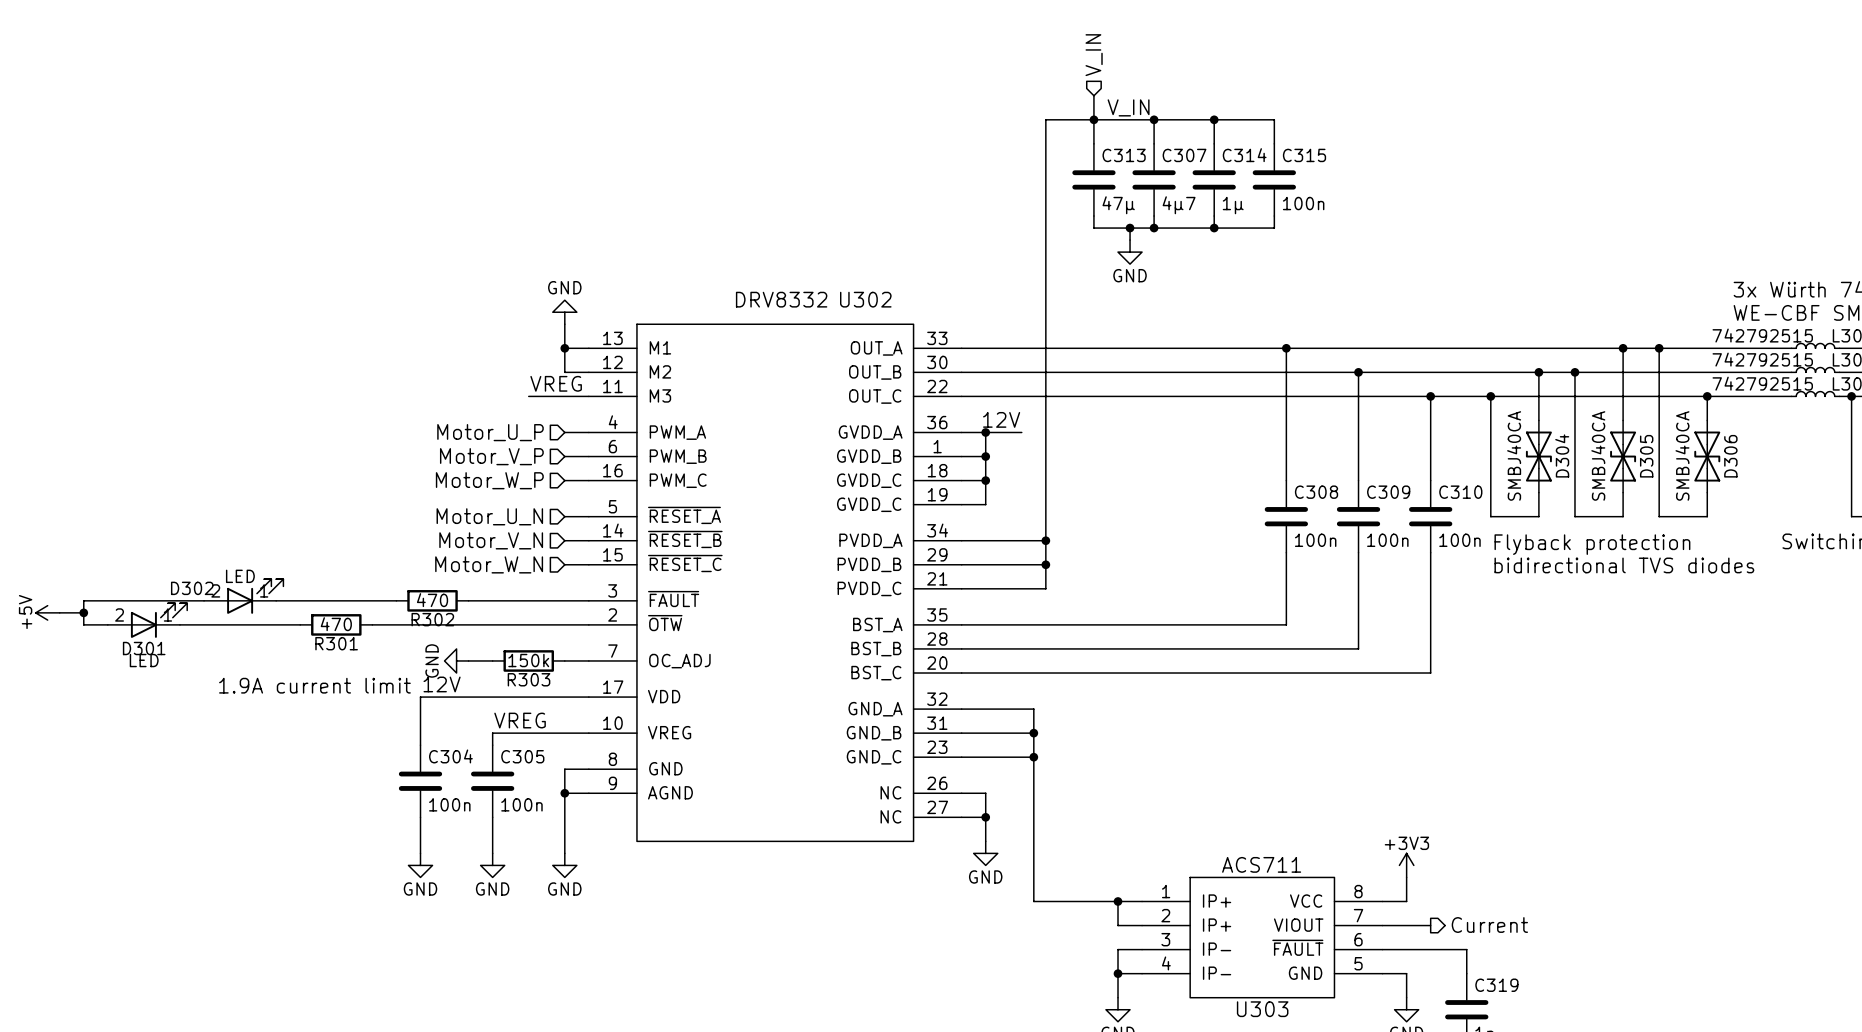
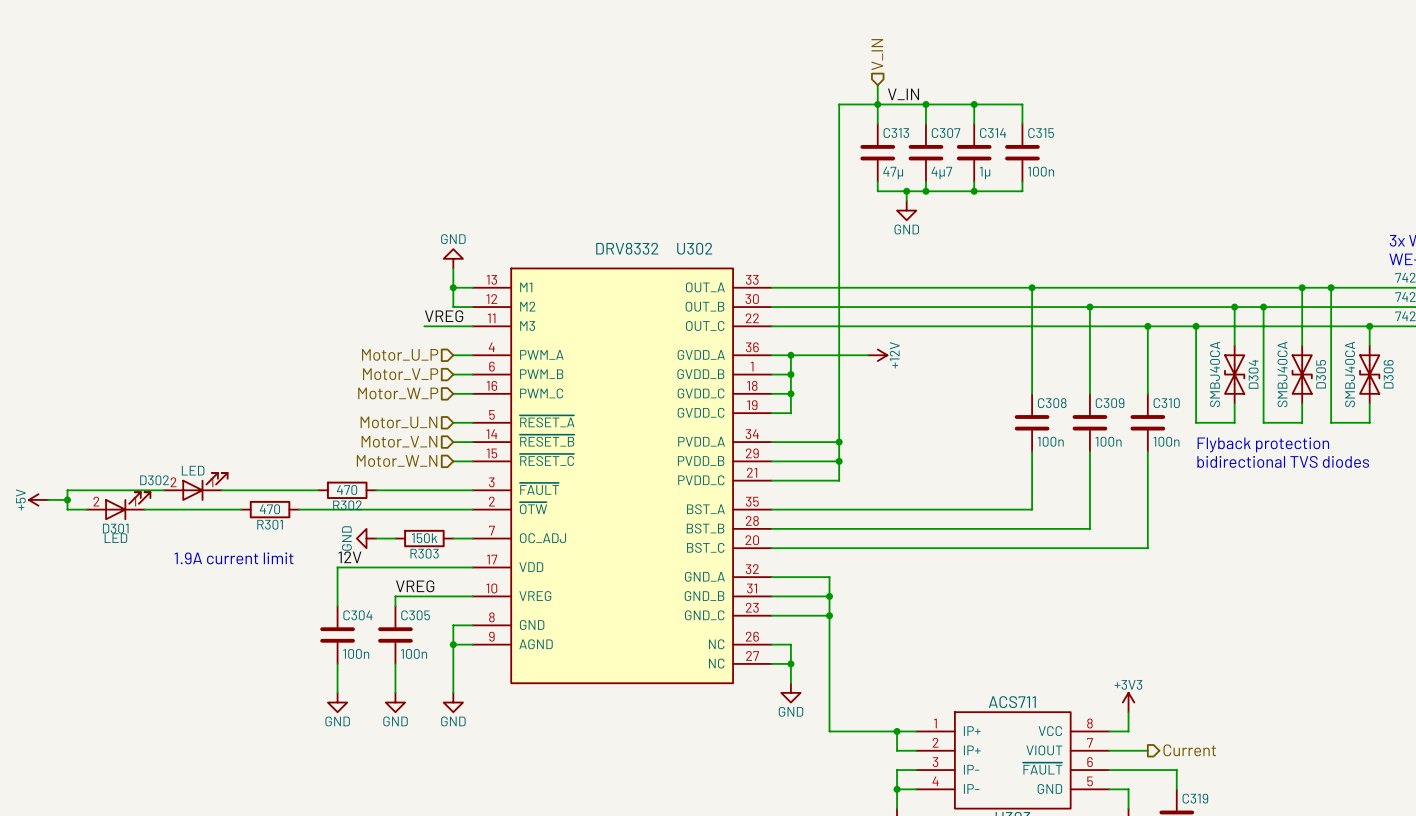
label: 12V (1001, 419) -> none
wire: none -> (819, 355) (868, 355)
power symbol: none -> +12V (877, 355)

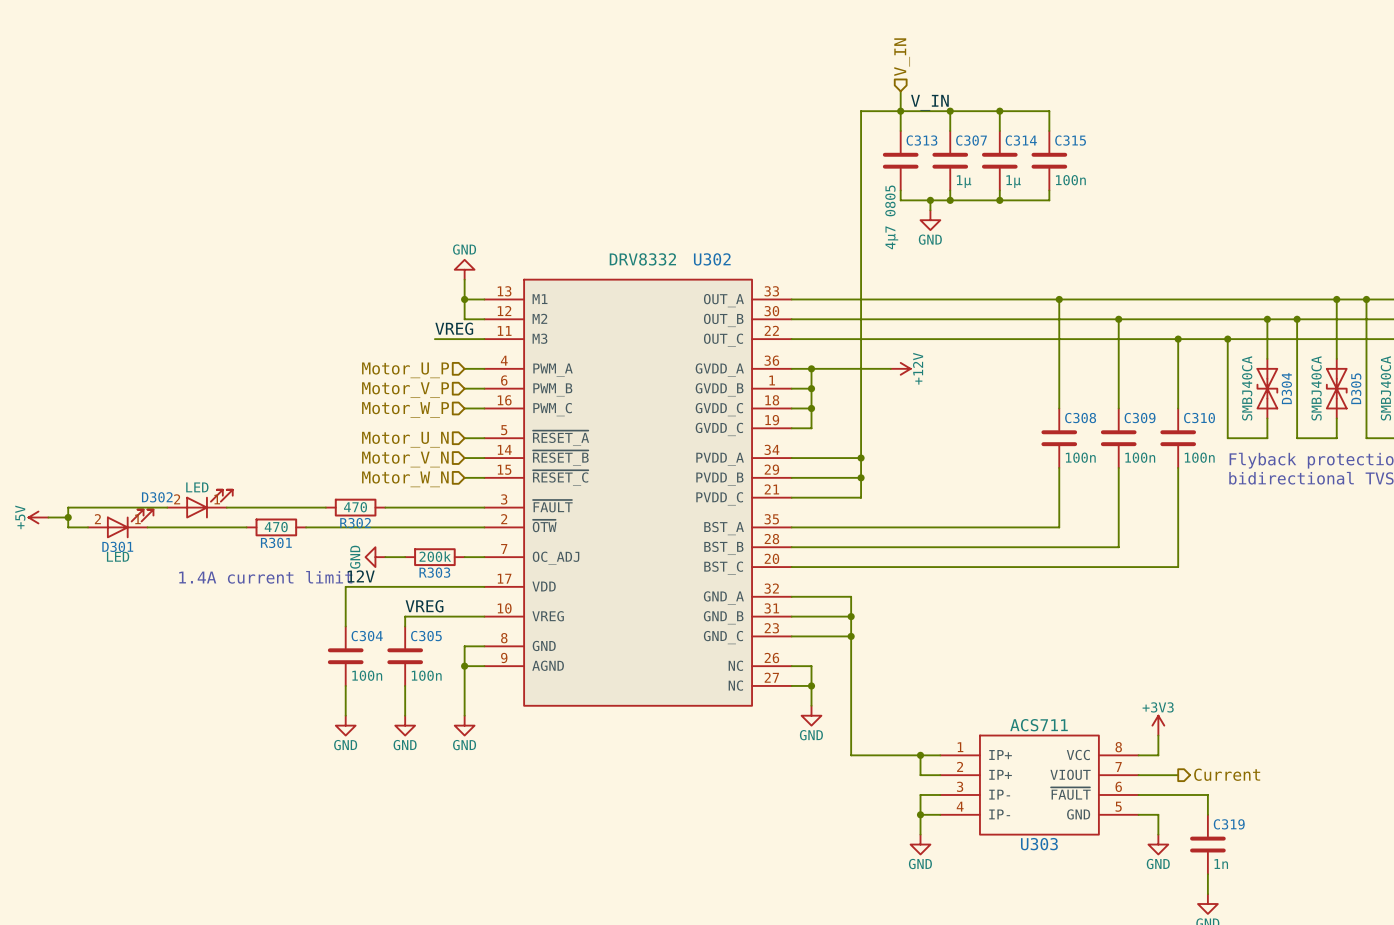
C313 value: 47µ (893, 173) -> 4µ7 0805 (891, 217)
C307 value: 4µ7 (941, 173) -> 1µ (964, 181)
R303 value: 150k (424, 538) -> 200k (435, 556)
text: 1.9A current limit (234, 558) -> 1.4A current limit (265, 577)

